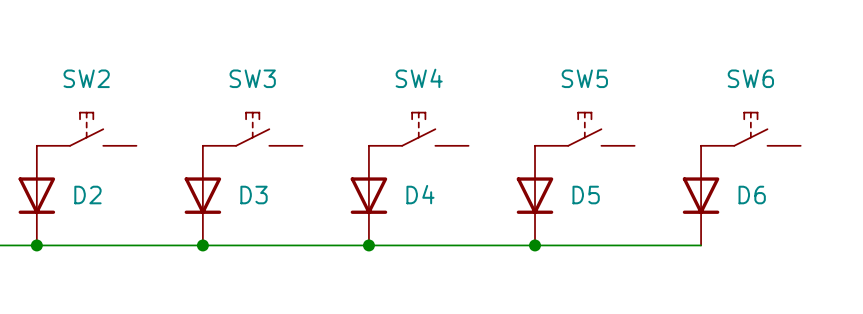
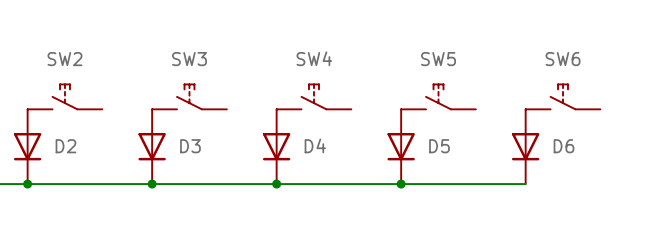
SW2 flip: as is (86, 129) -> left-right (64, 96)
SW3 flip: as is (252, 129) -> left-right (189, 96)
SW4 flip: as is (418, 129) -> left-right (313, 96)
SW5 flip: as is (584, 129) -> left-right (438, 96)
SW6 flip: as is (750, 129) -> left-right (563, 96)

